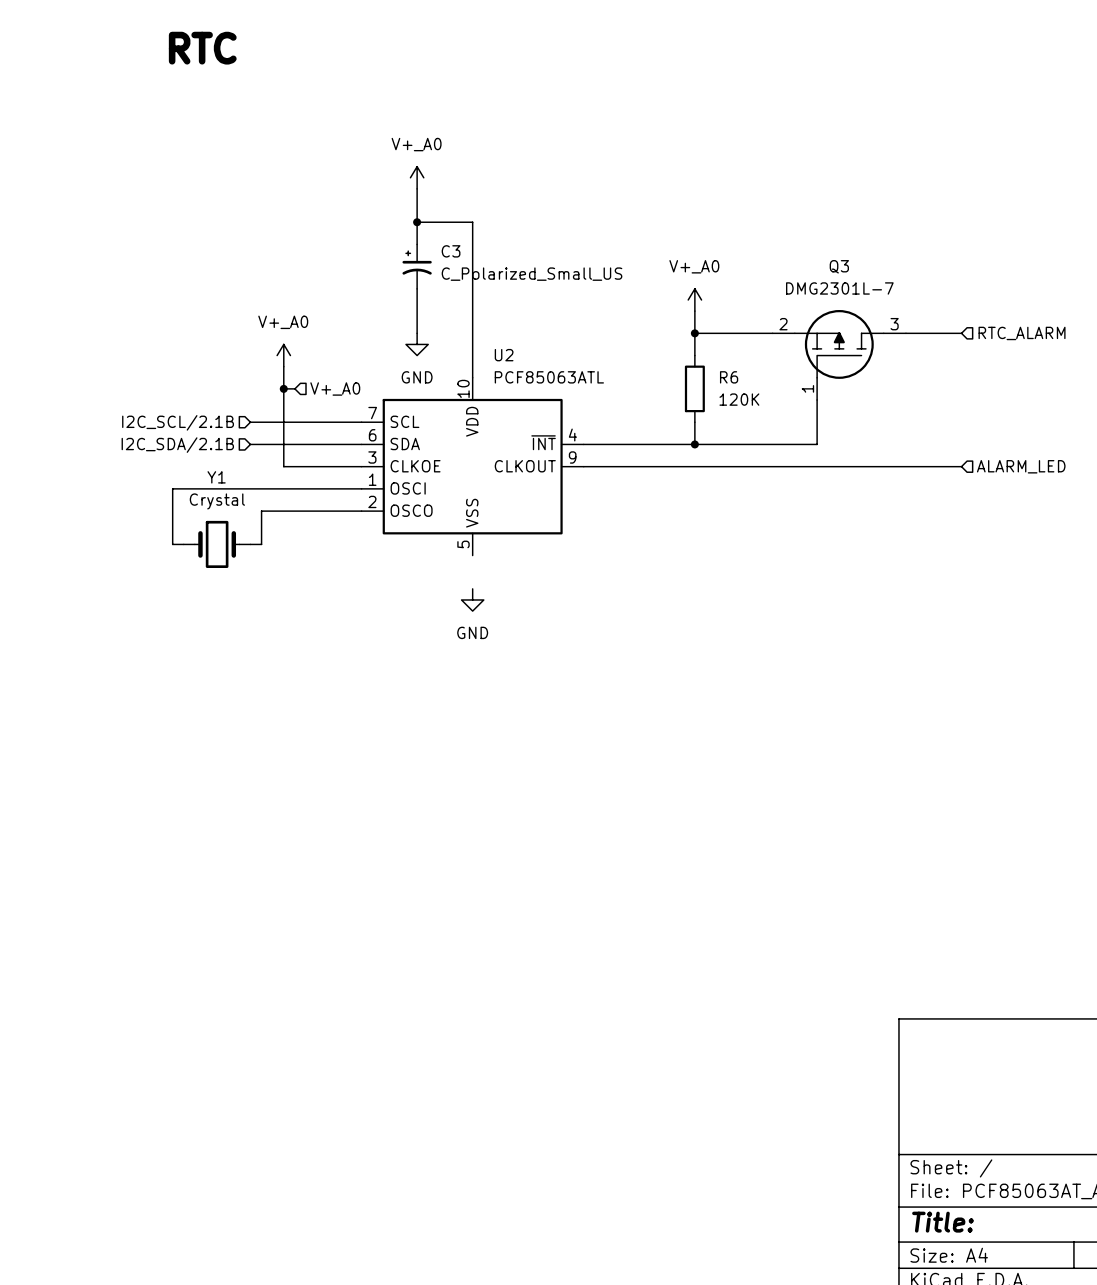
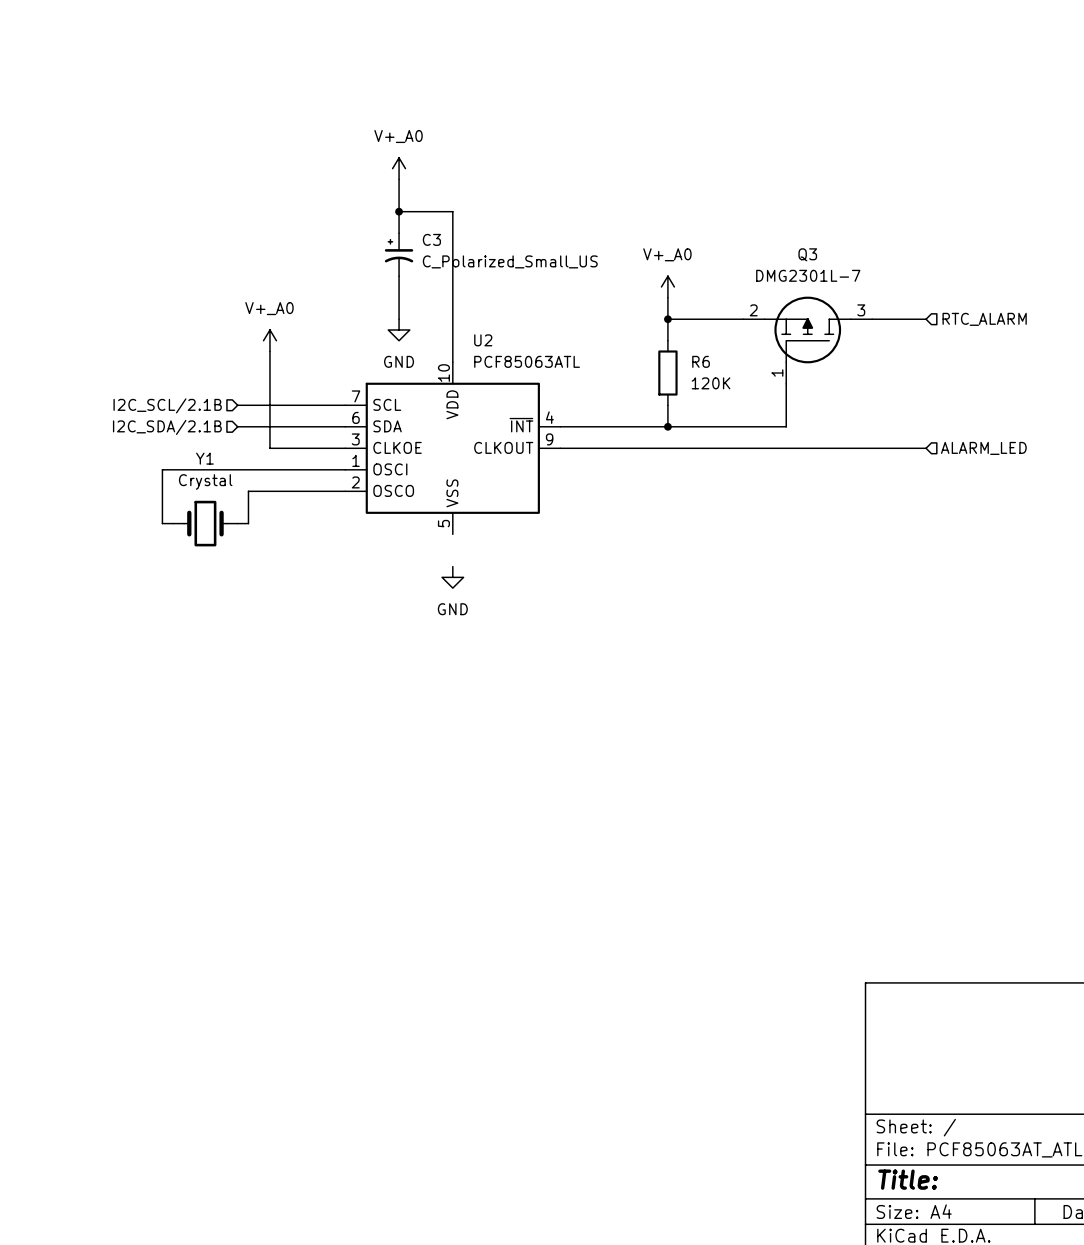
text: RTC (202, 48) -> none
wire: (283, 388) (294, 388) -> none
junction: (283, 388) -> none
hierarchical label: V+_A0 (335, 389) -> none

